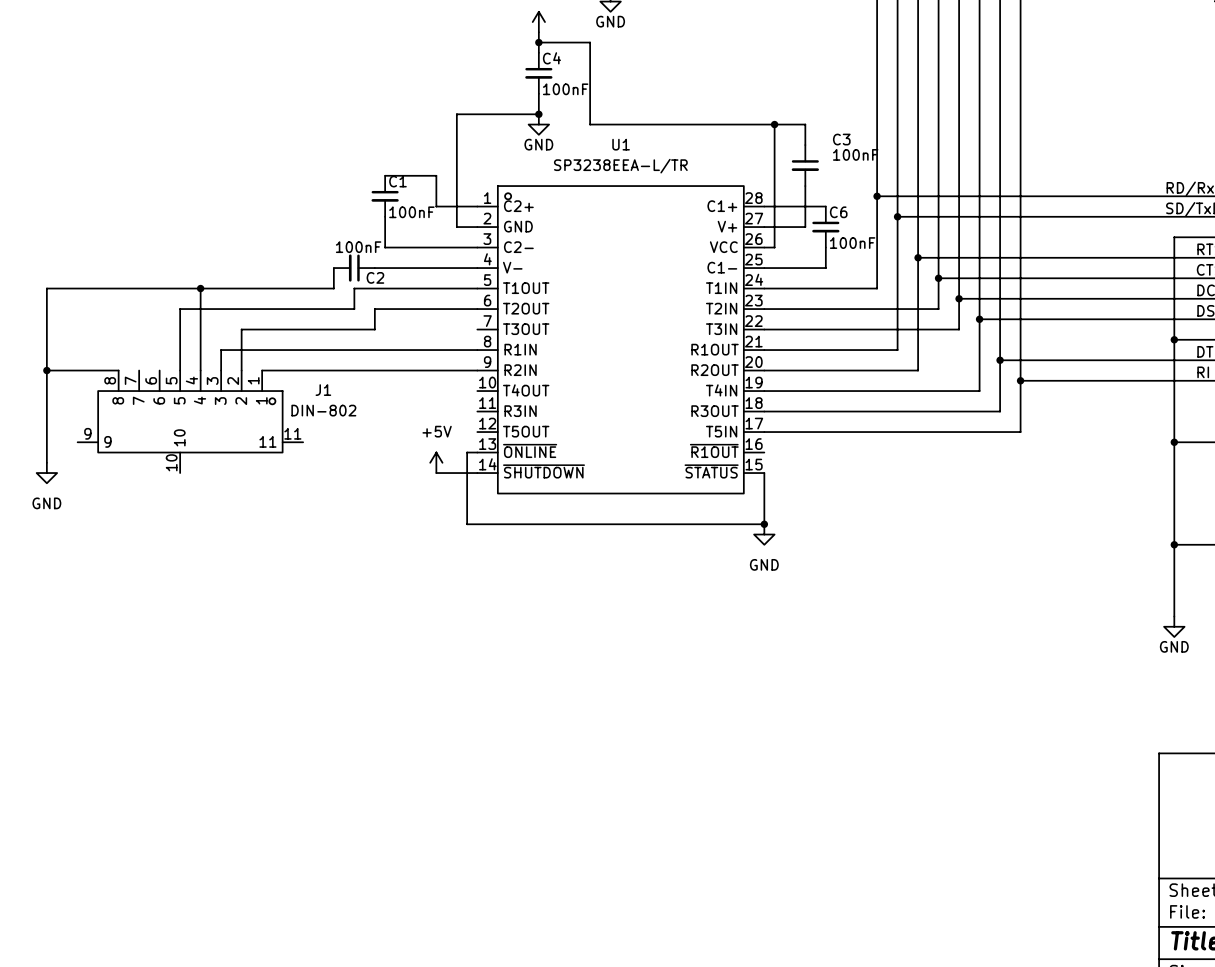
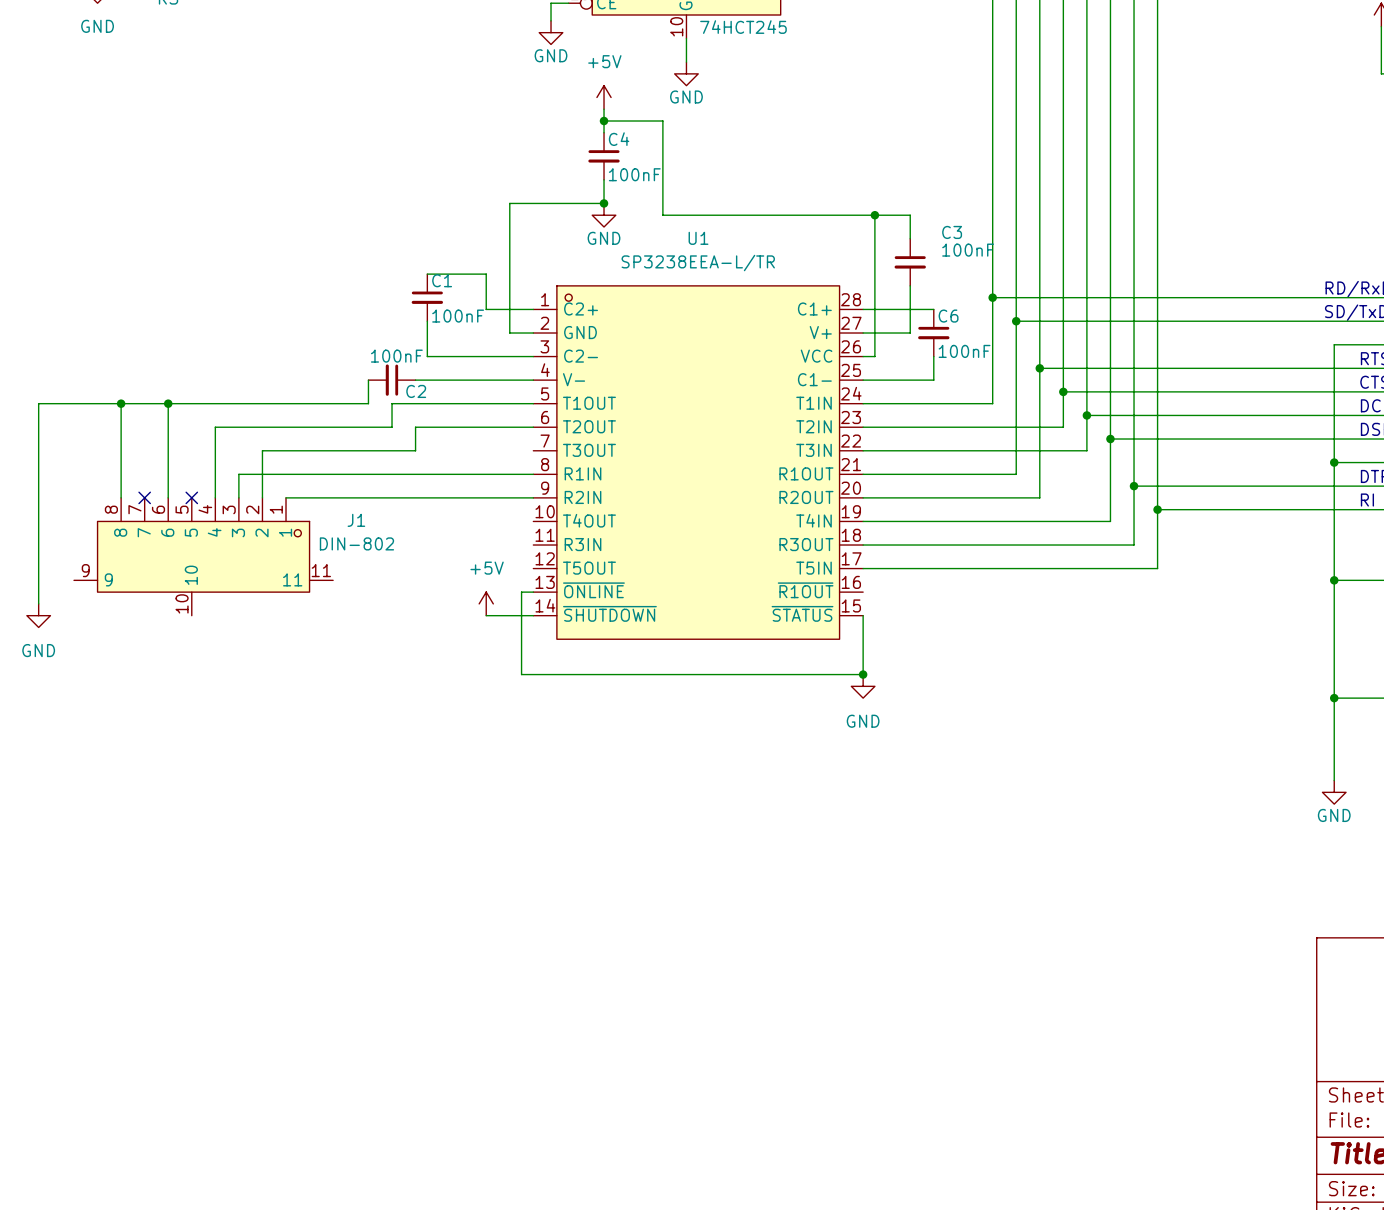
junction: none -> (121, 403)
wire: none -> (168, 403) (168, 497)
junction: none -> (168, 403)
wire: (200, 288) (200, 309) (180, 309) (180, 370) -> none
junction: (200, 288) -> none
wire: (46, 370) (118, 370) -> (121, 403) (121, 497)
junction: (46, 370) -> none
no-connect mark: none -> (144, 497)
no-connect mark: none -> (191, 497)

